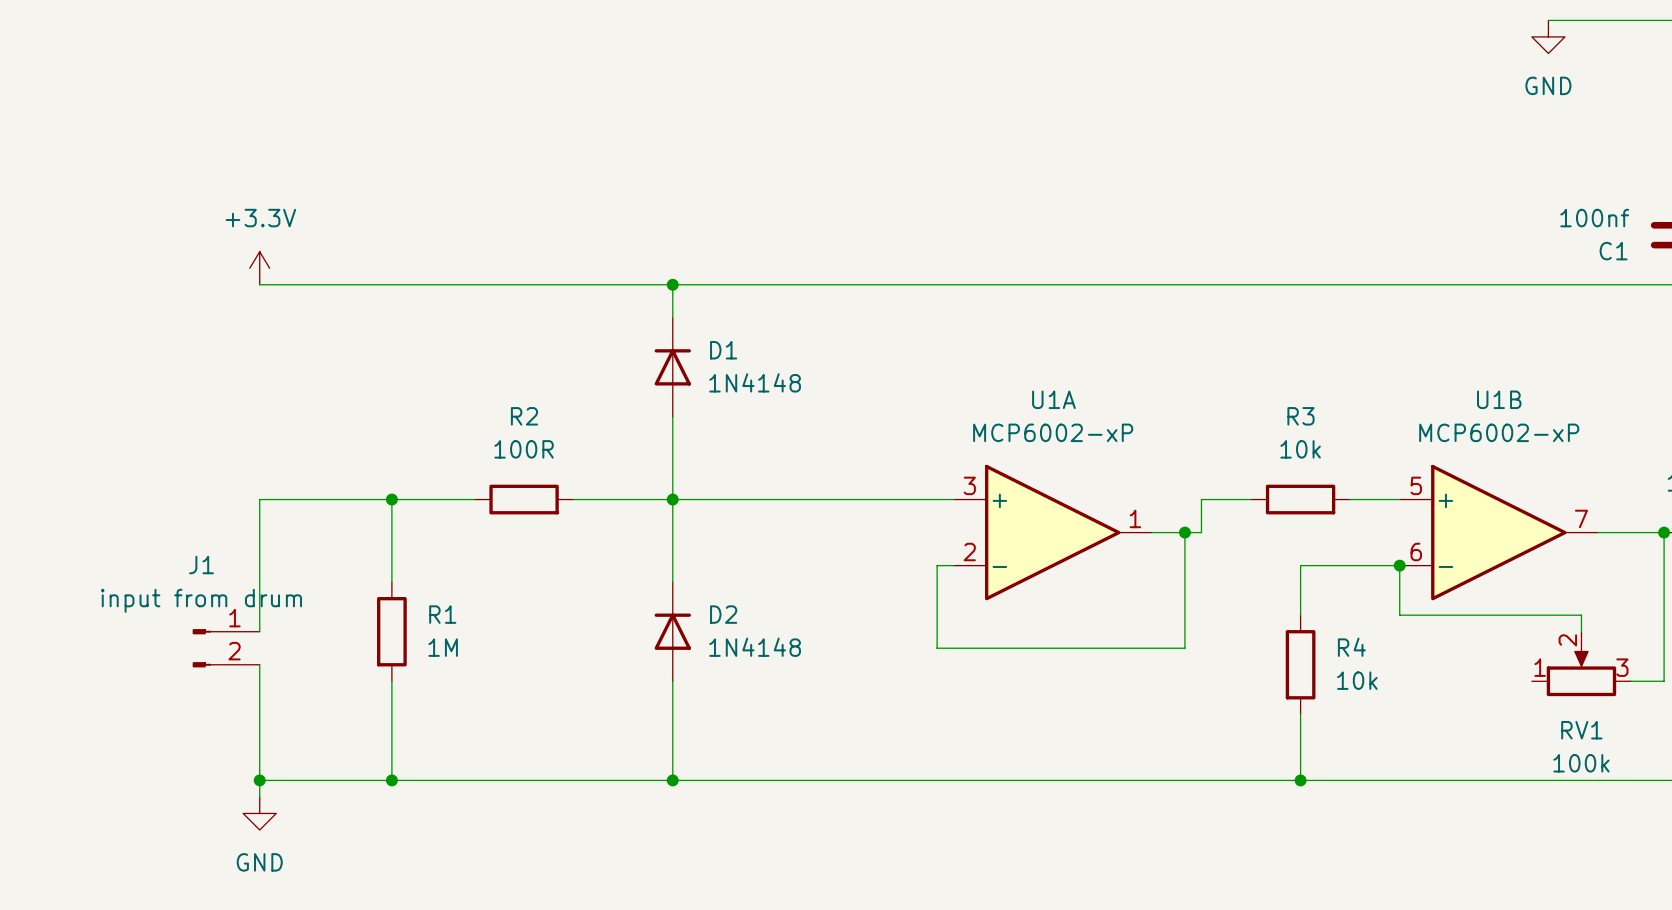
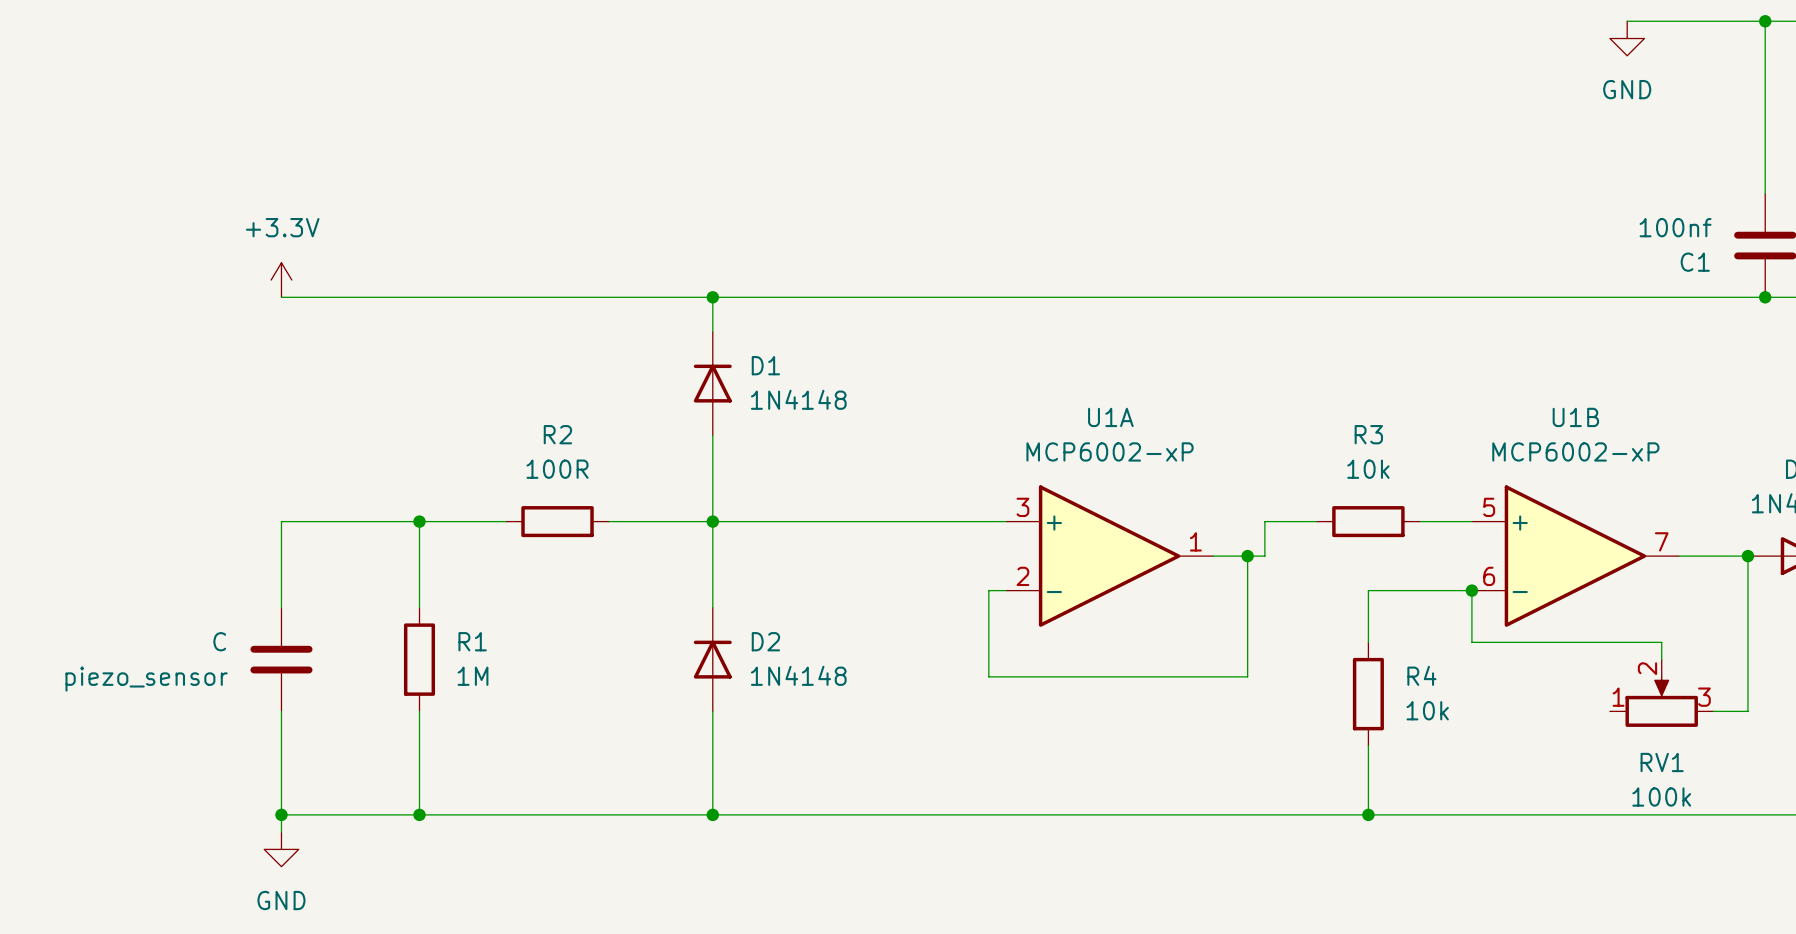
piezo_sensor: none -> C (281, 659)
J1: input from drum (226, 648) -> none

